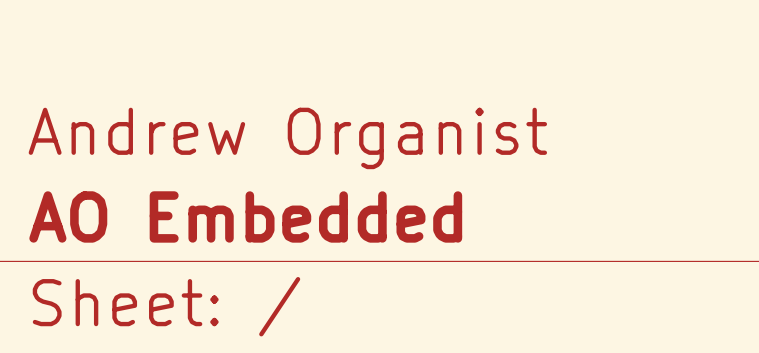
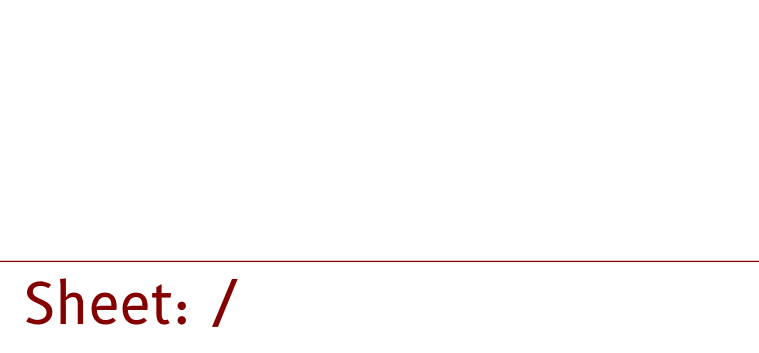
title block: Andrew Organist (287, 138) -> none
title block: AO Embedded (245, 216) -> none

